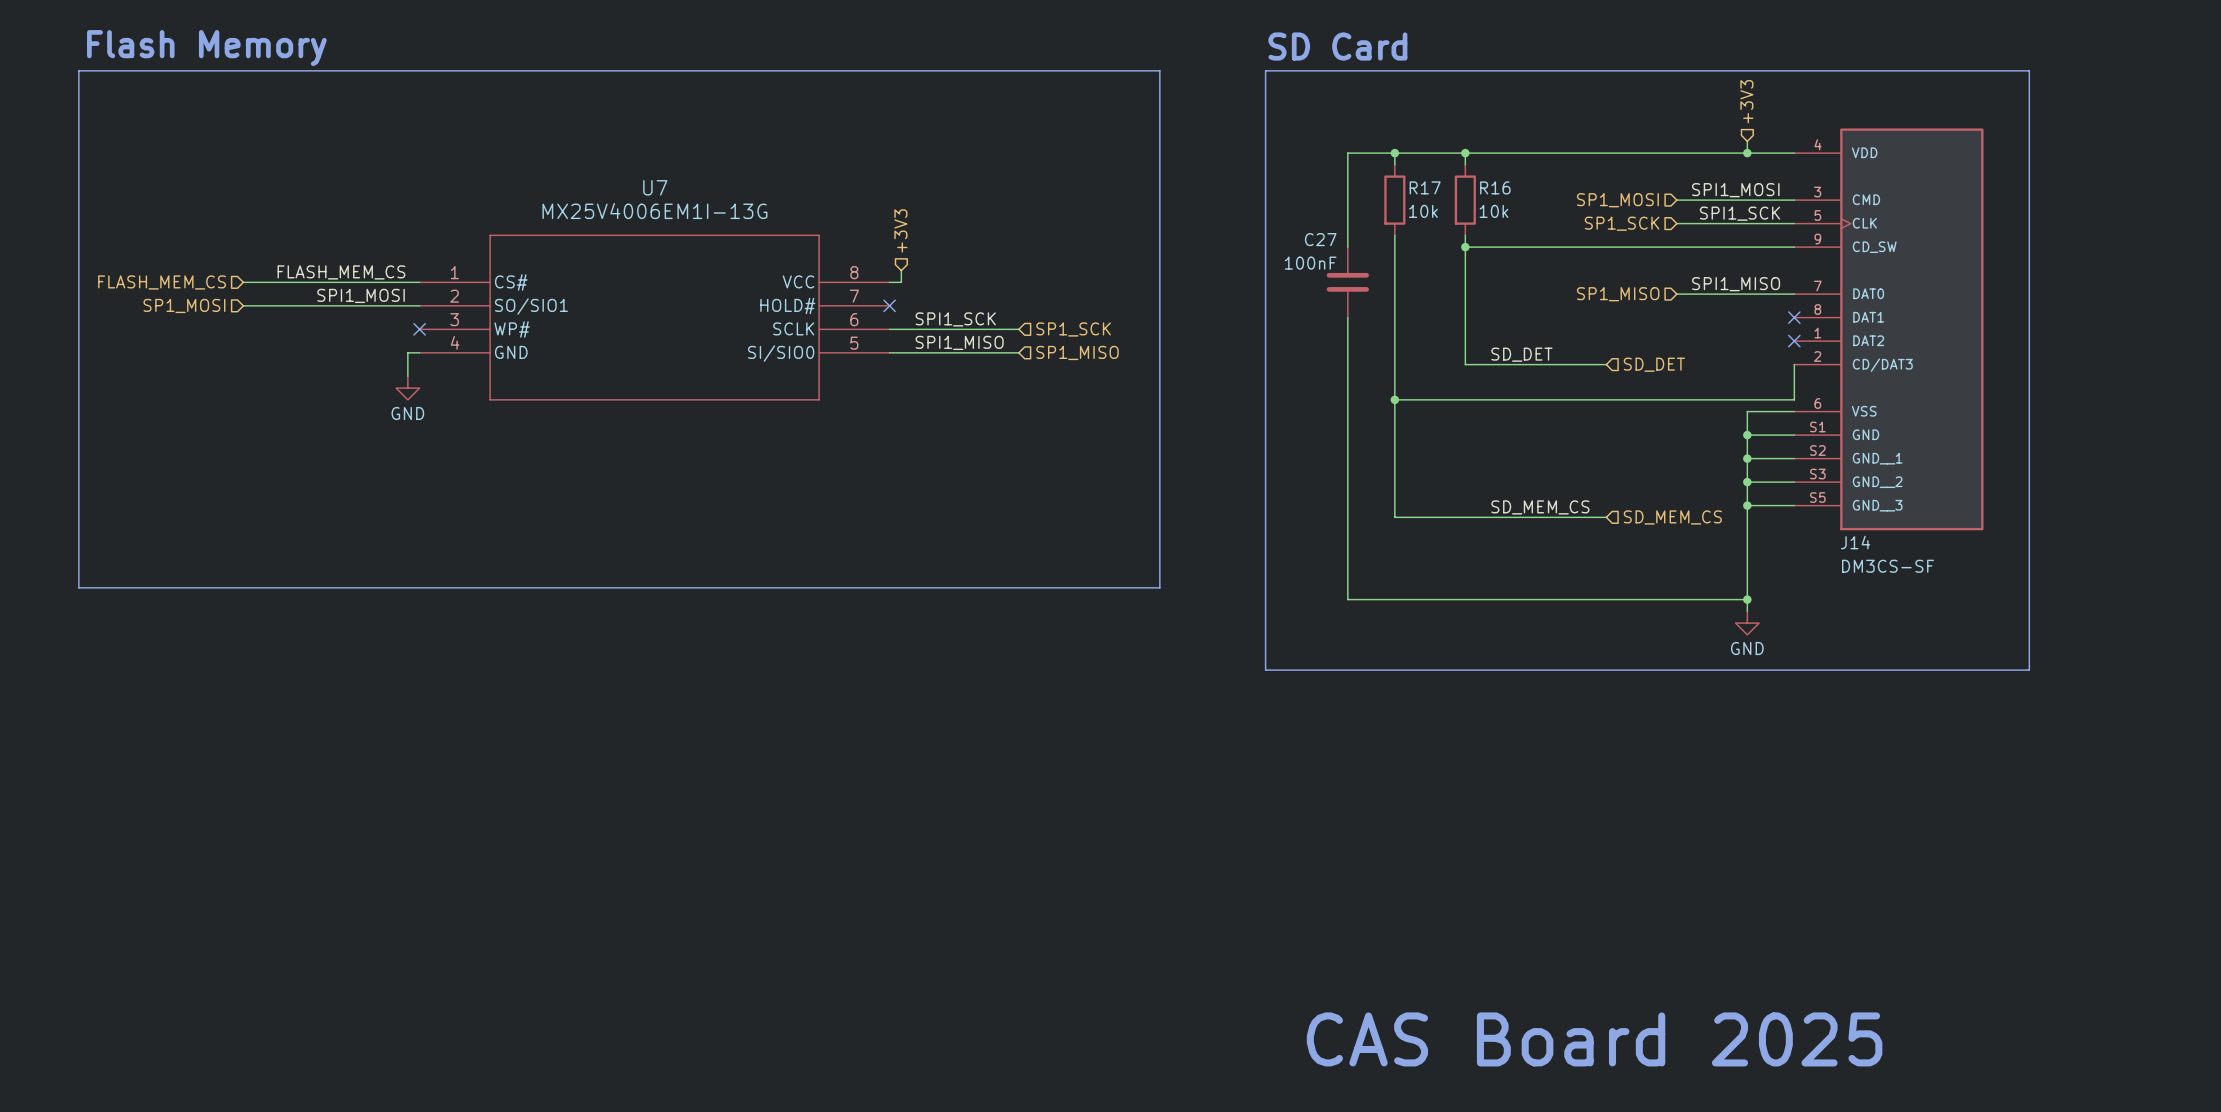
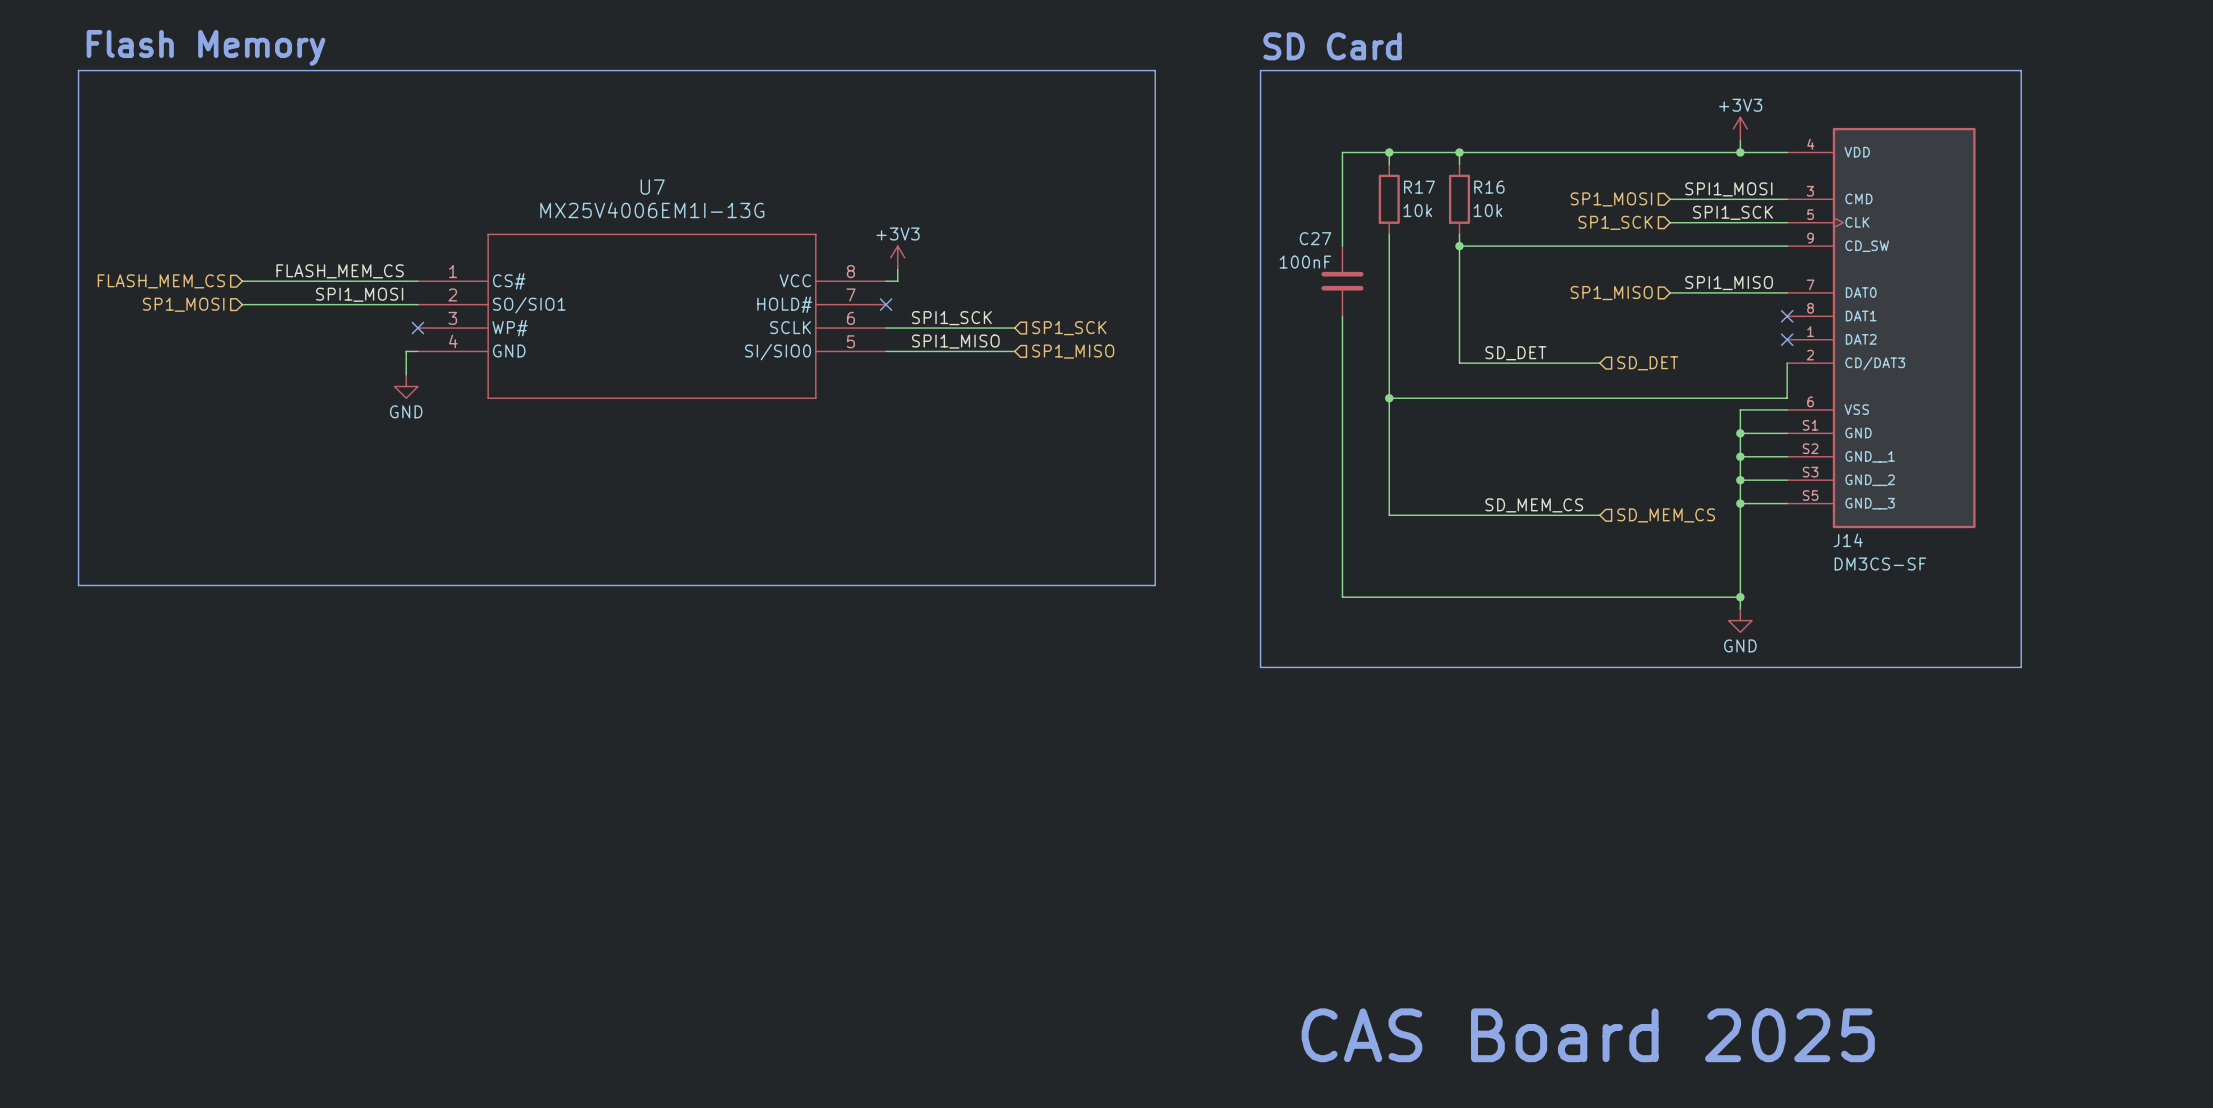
hierarchical label: +3V3 (1746, 101) -> none
power symbol: none -> +3V3 (1740, 129)
hierarchical label: +3V3 (900, 230) -> none
power symbol: none -> +3V3 (897, 257)

